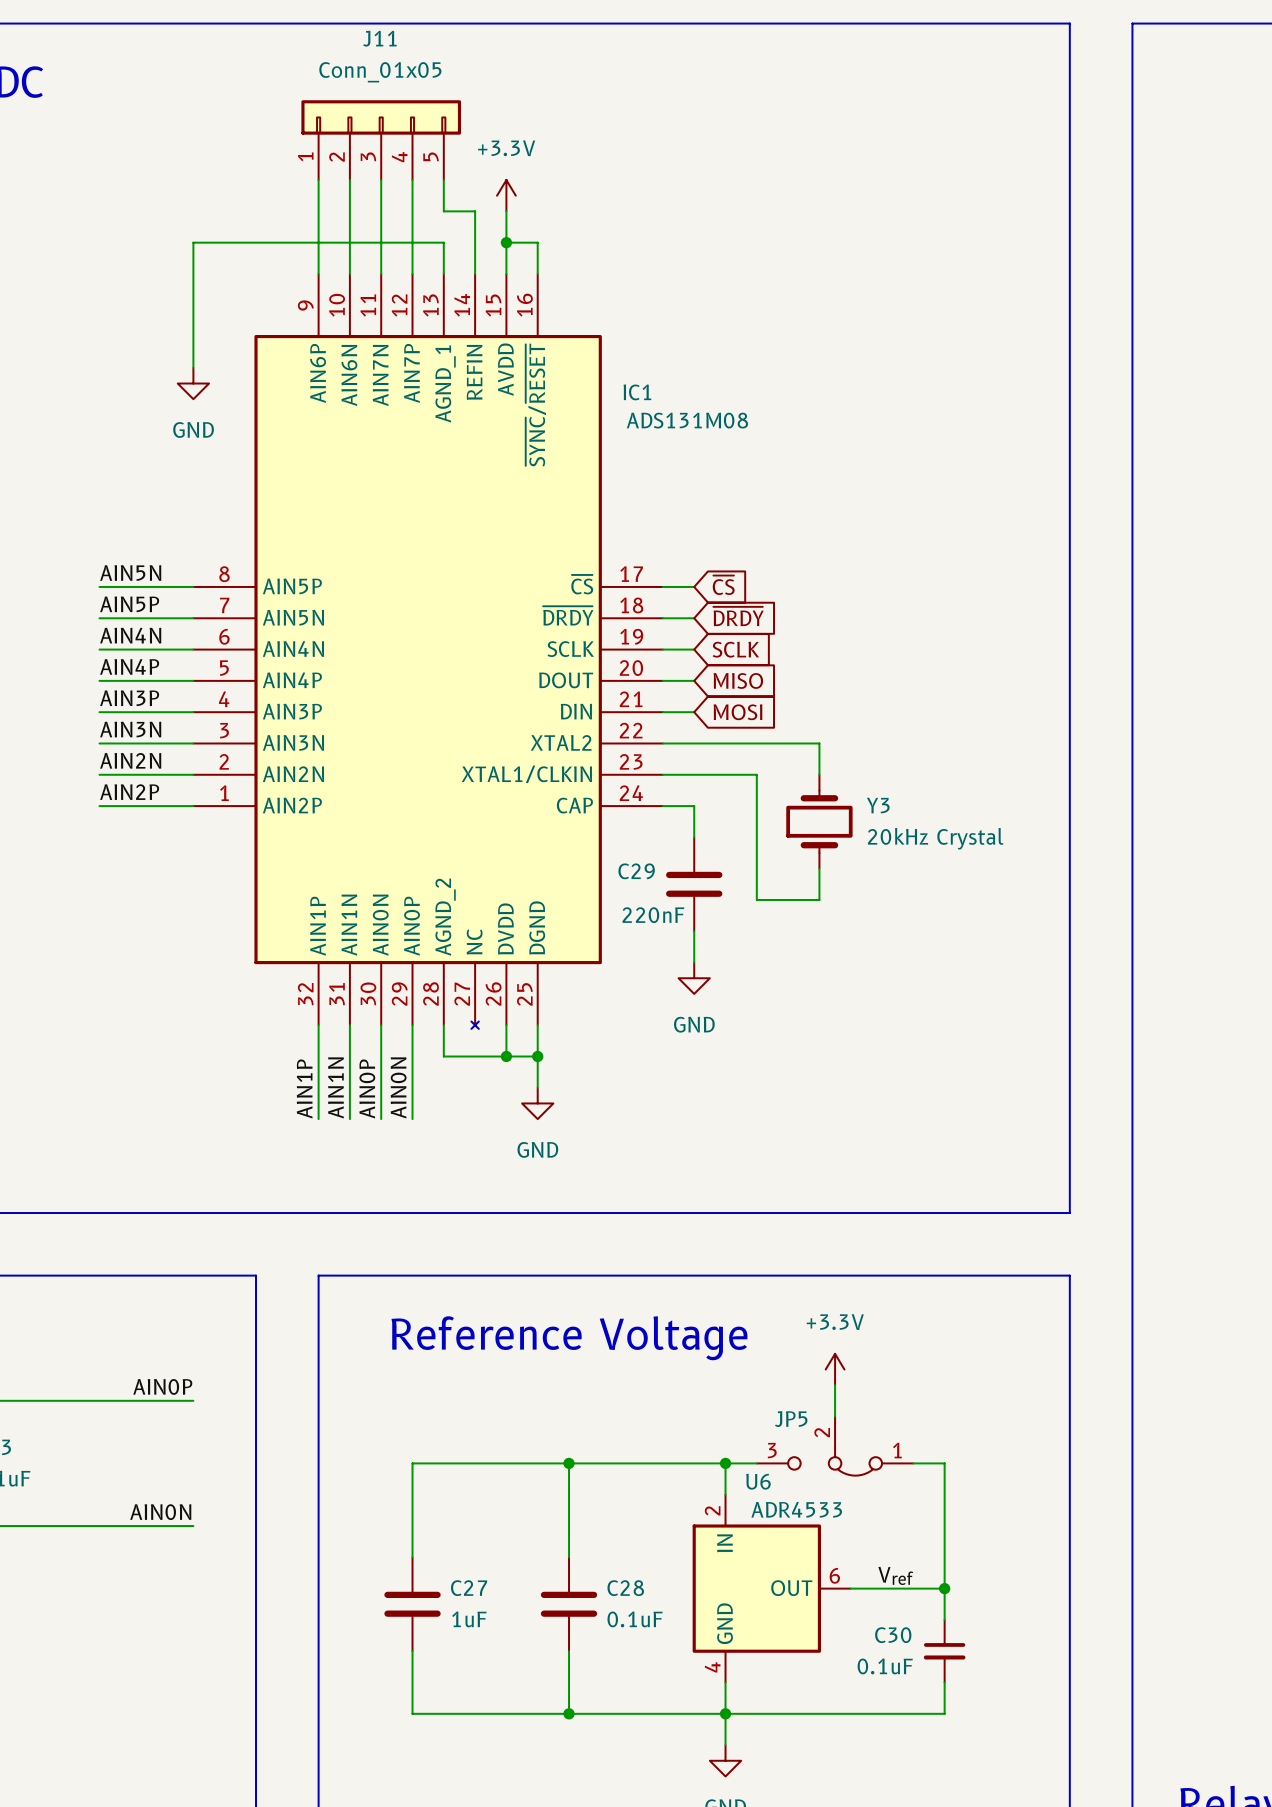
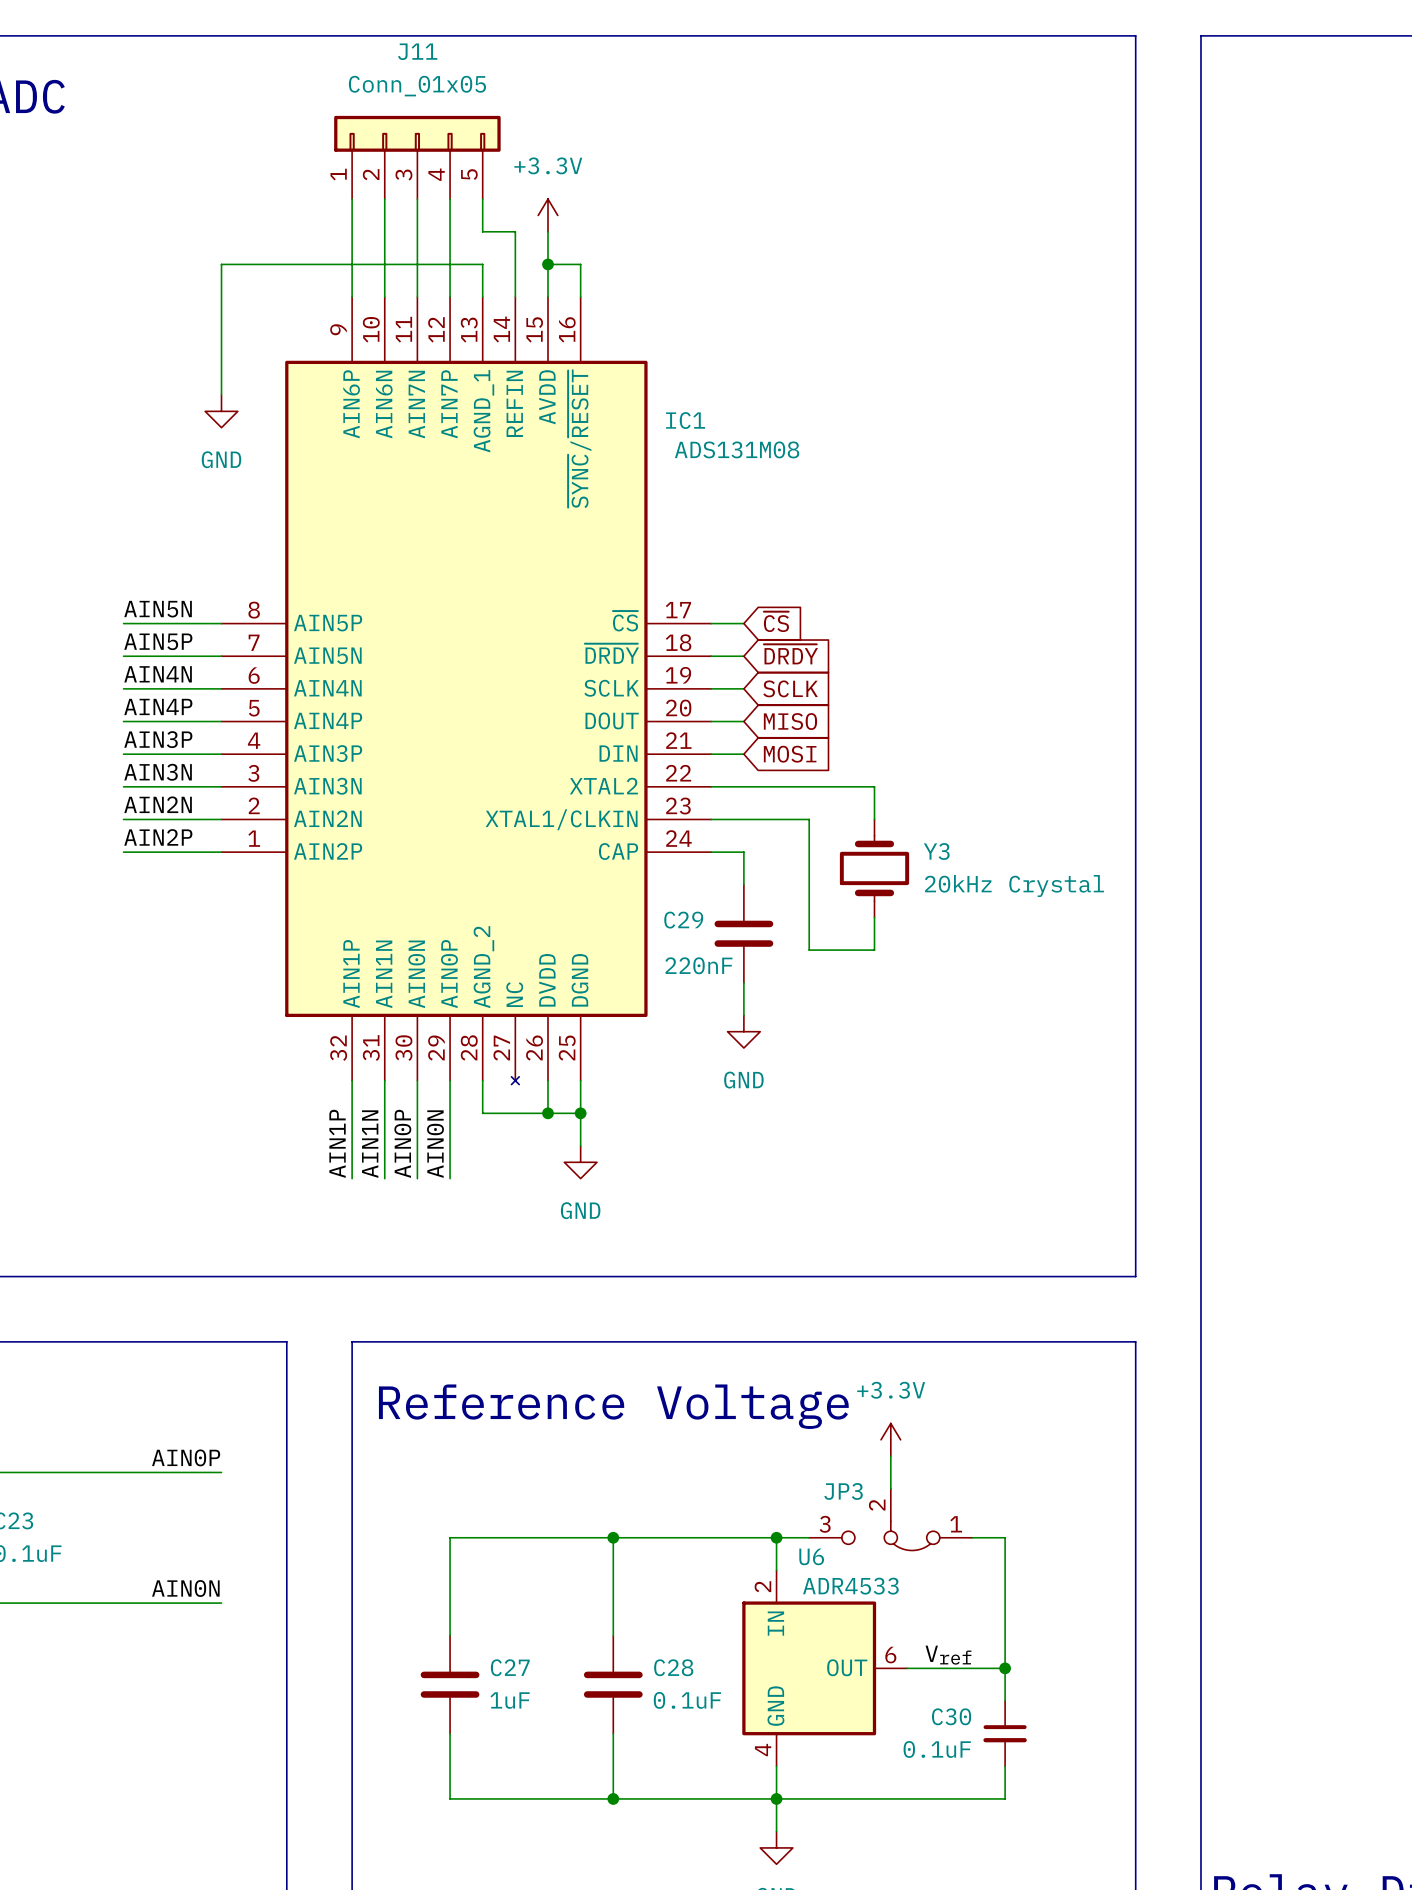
JP5 name: JP5 (791, 1419) -> JP3 (843, 1491)

